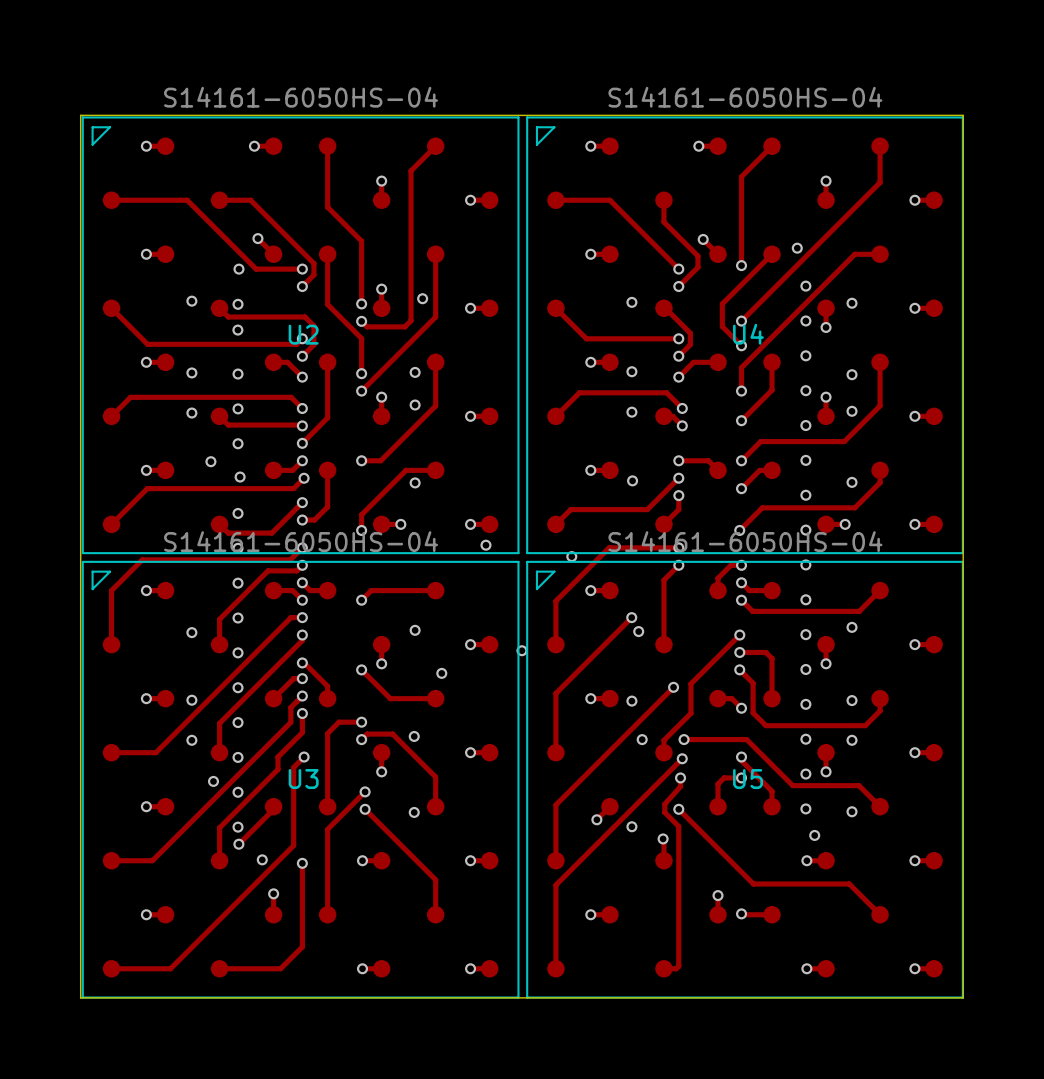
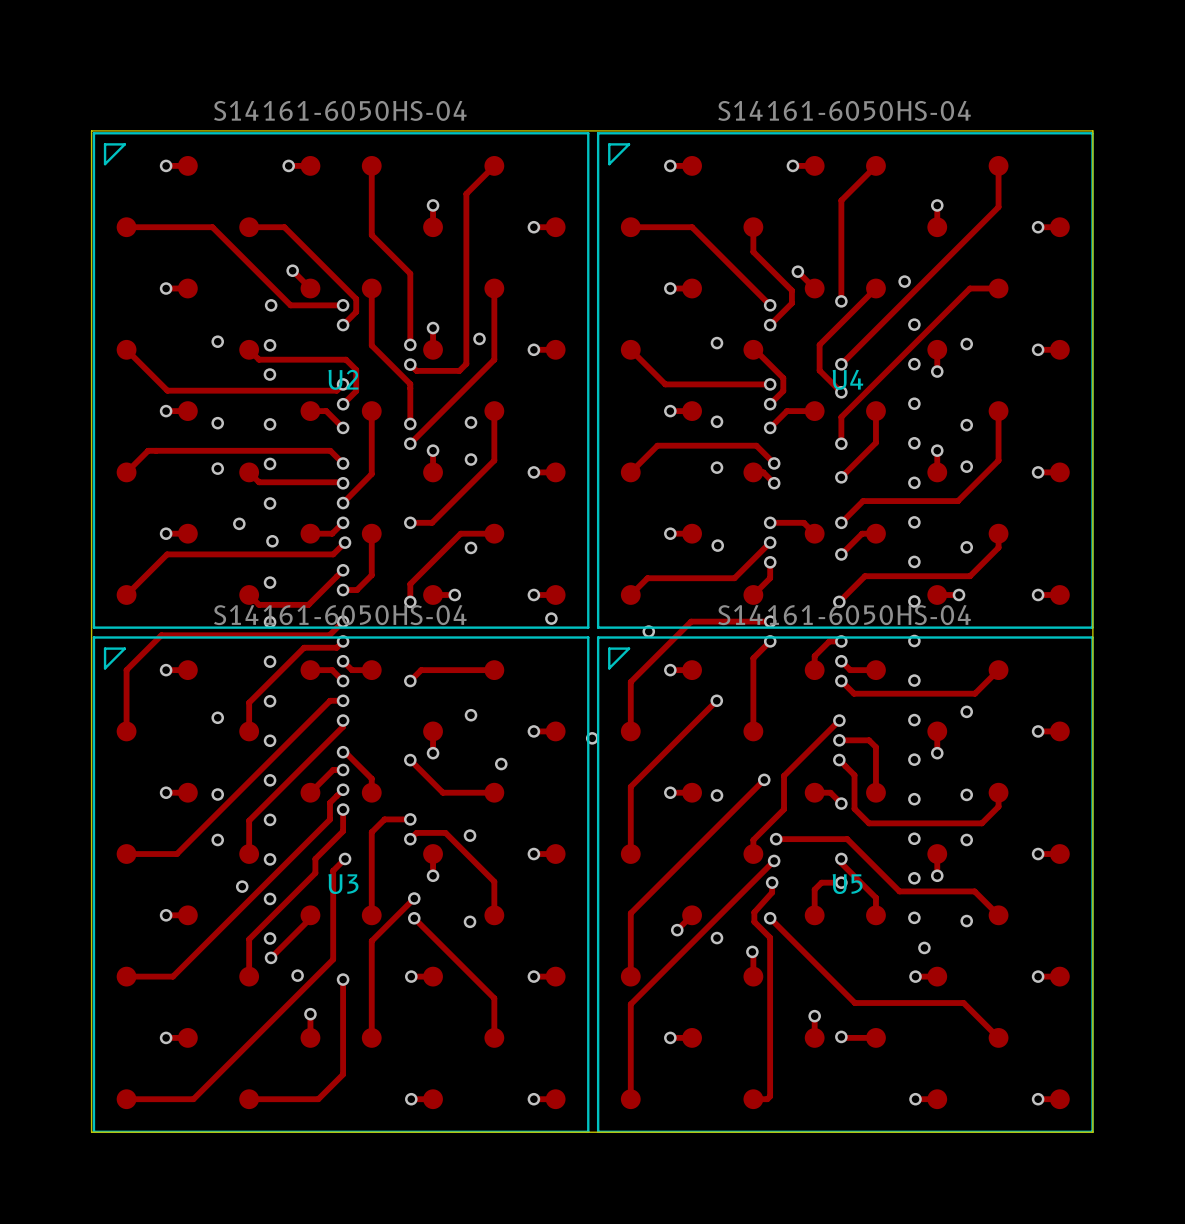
via: (638, 631) -> none
via: (642, 739) -> none

